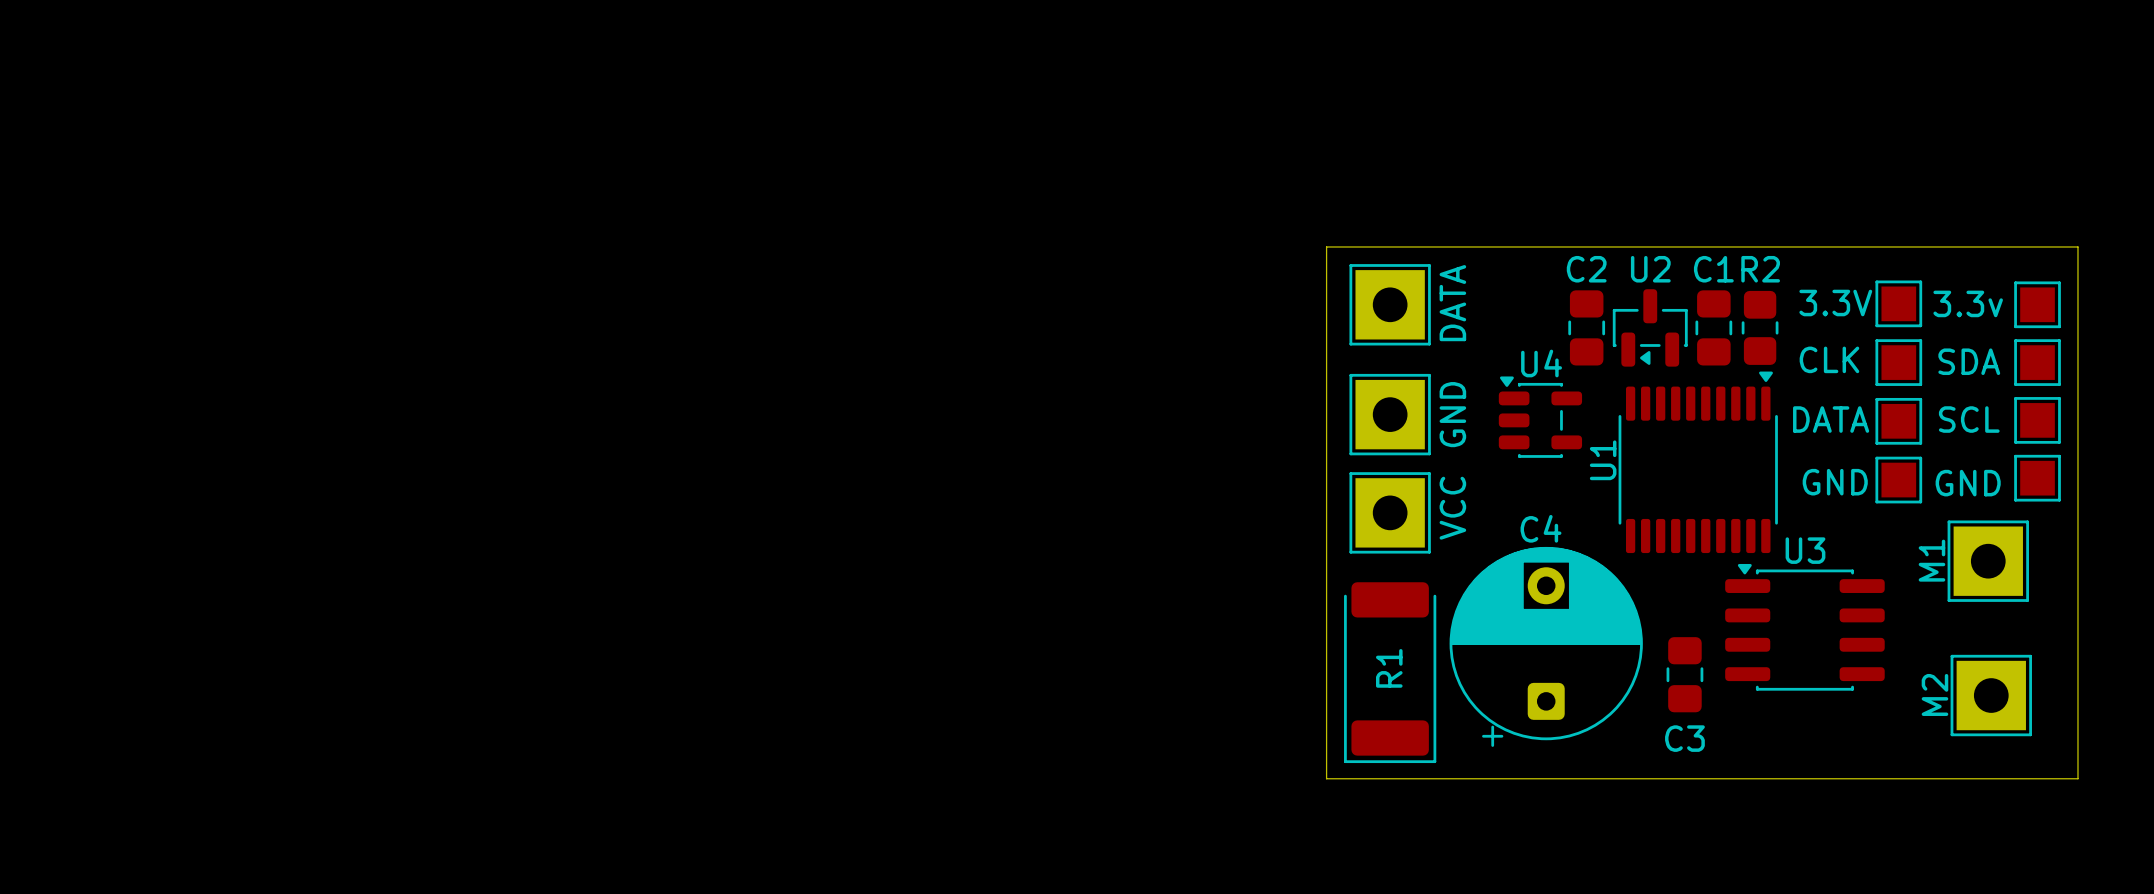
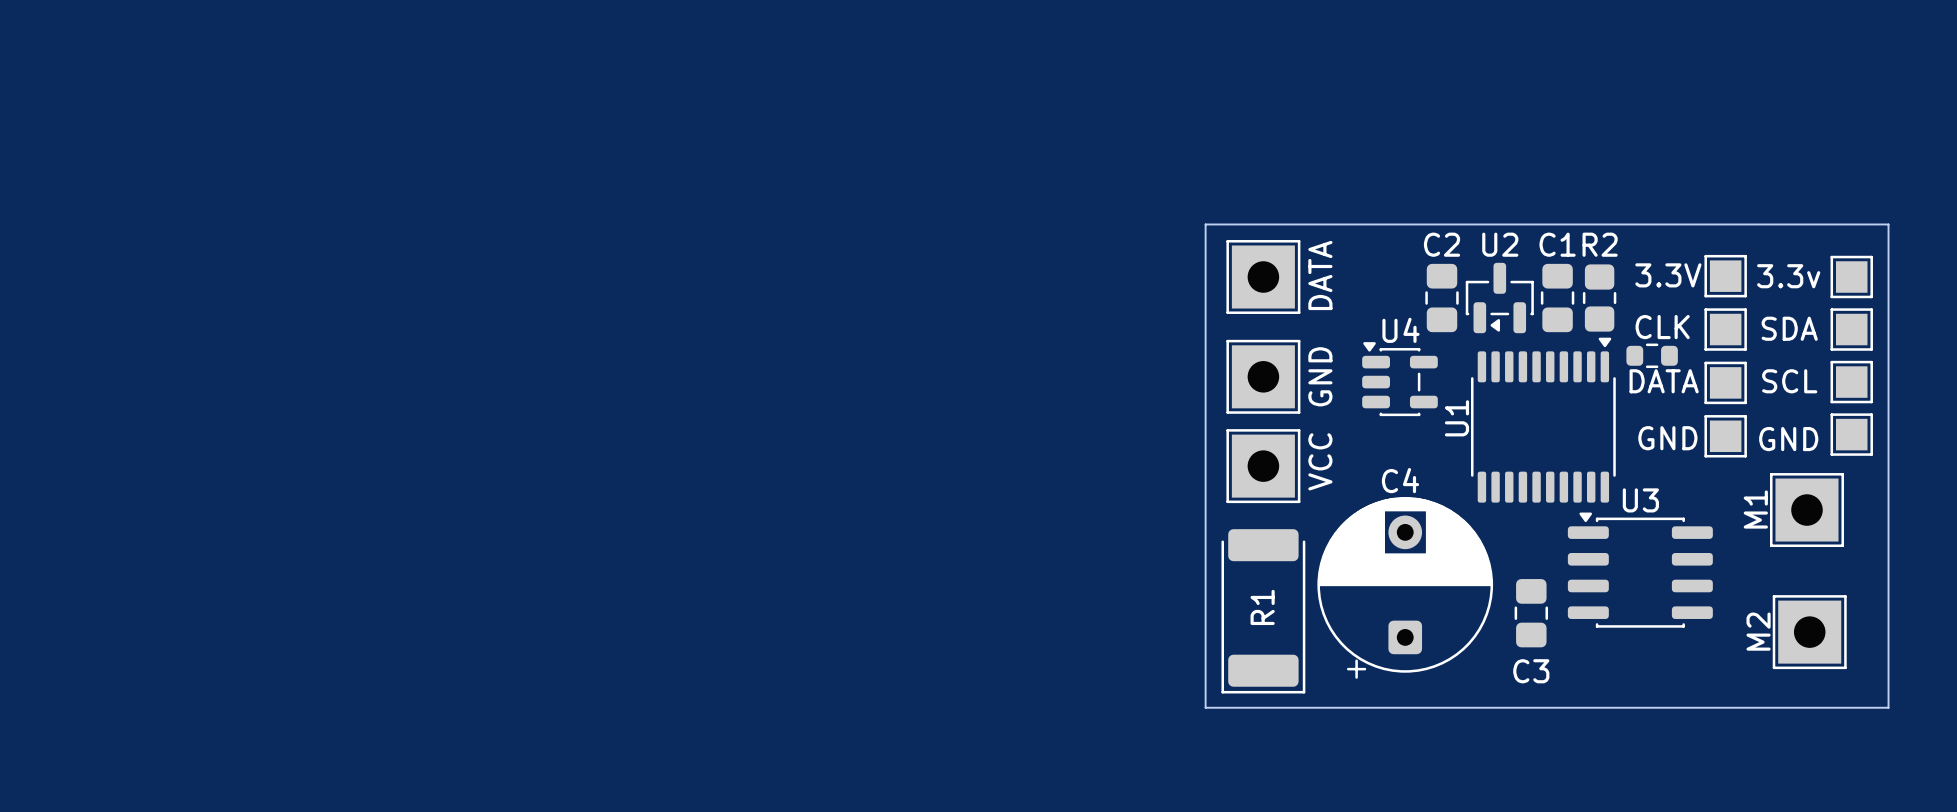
part: none -> (1652, 355)

